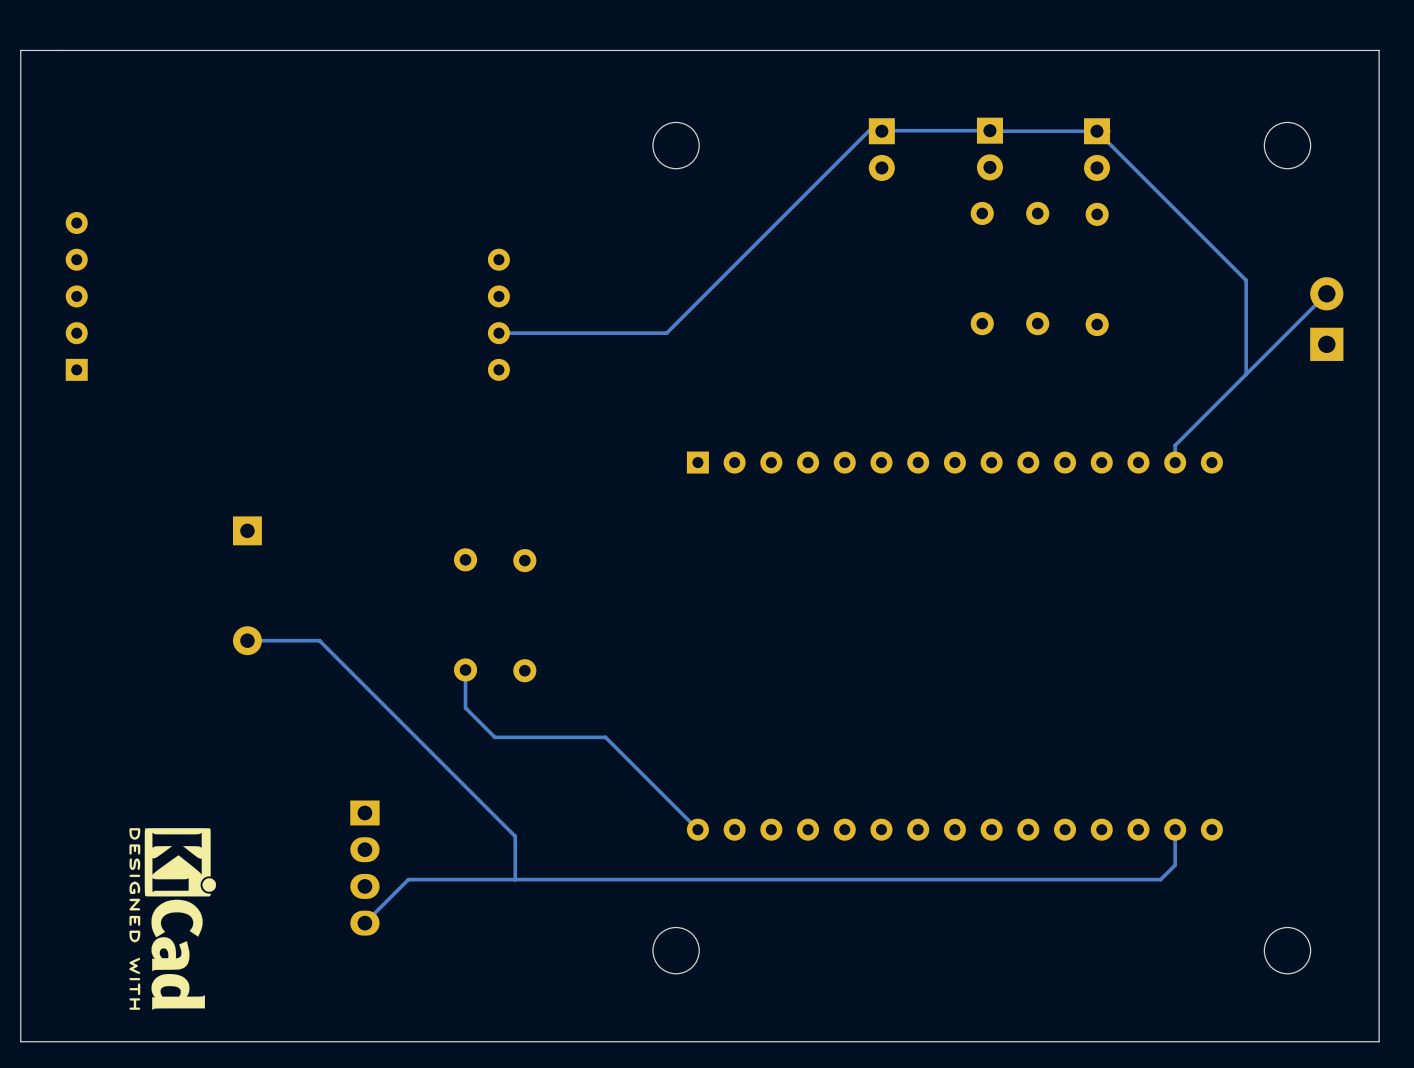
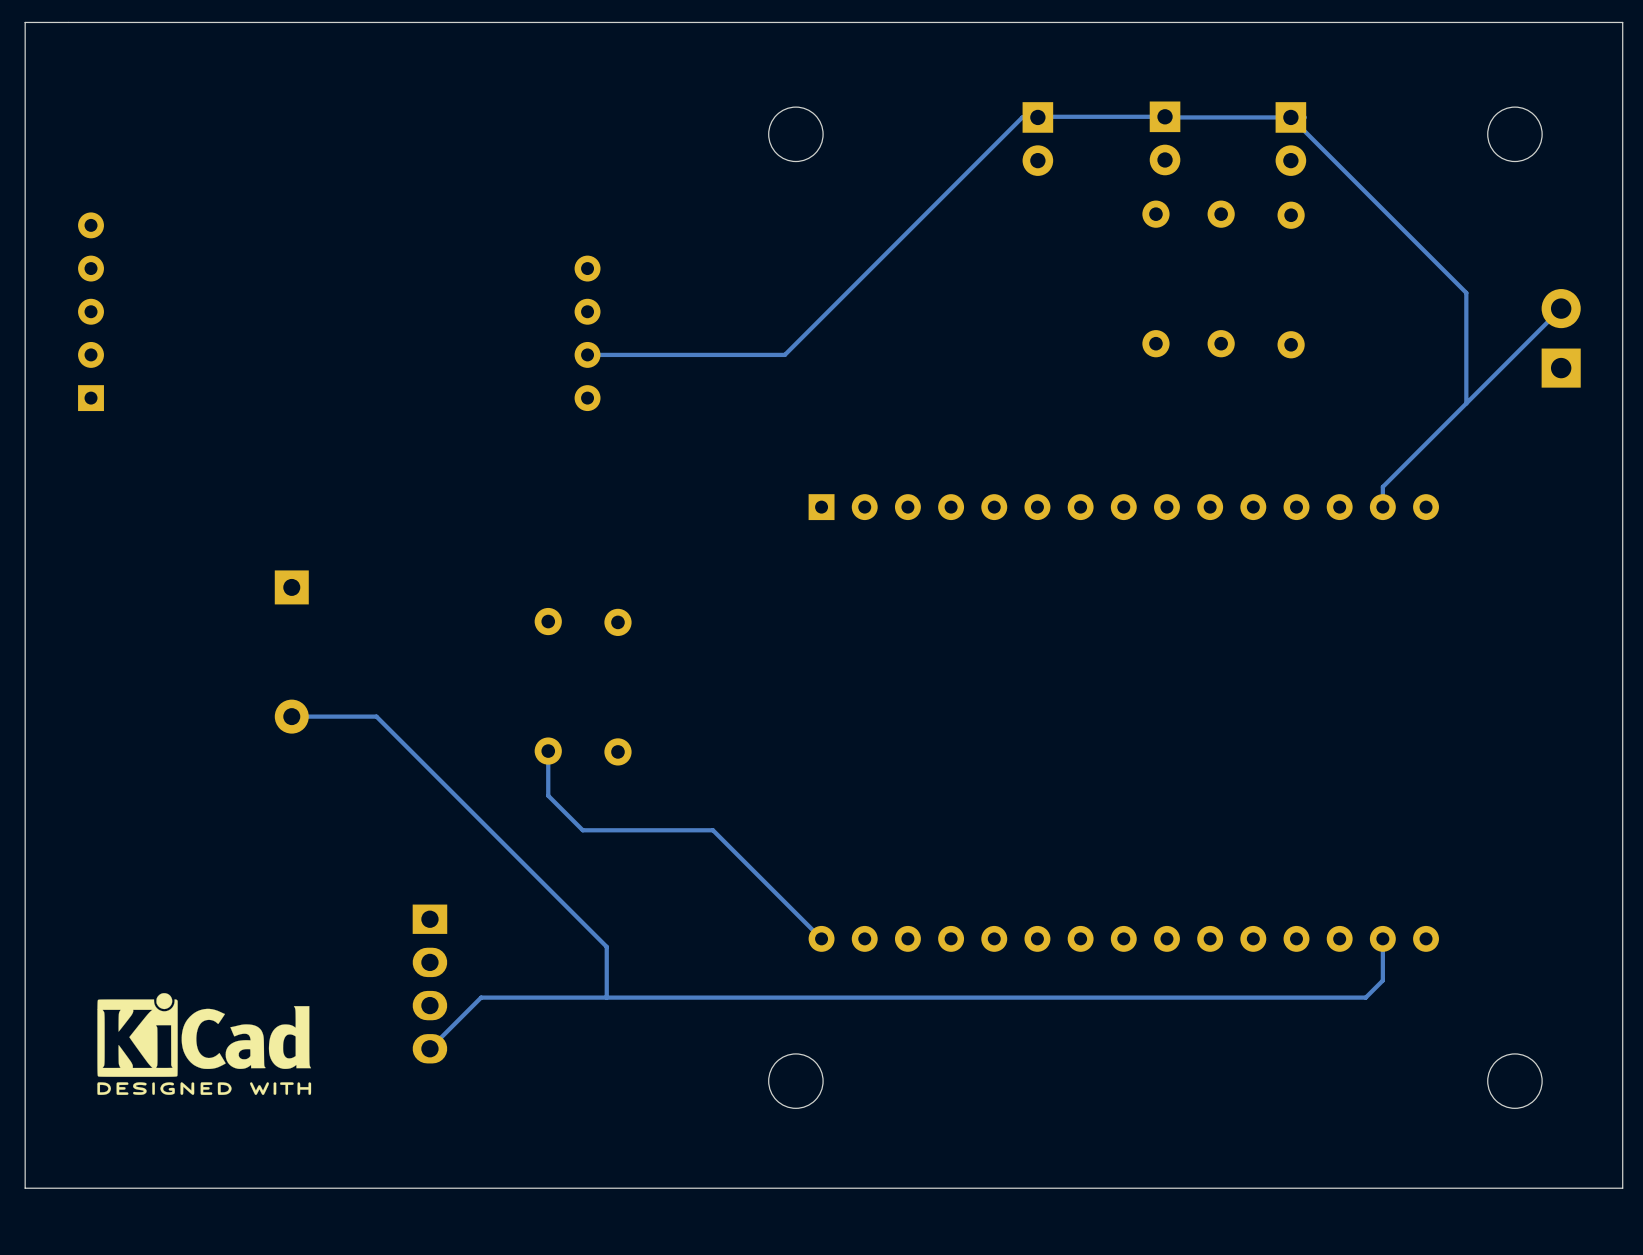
drawing shape: [129, 828, 217, 1010] -> [97, 993, 312, 1095]

